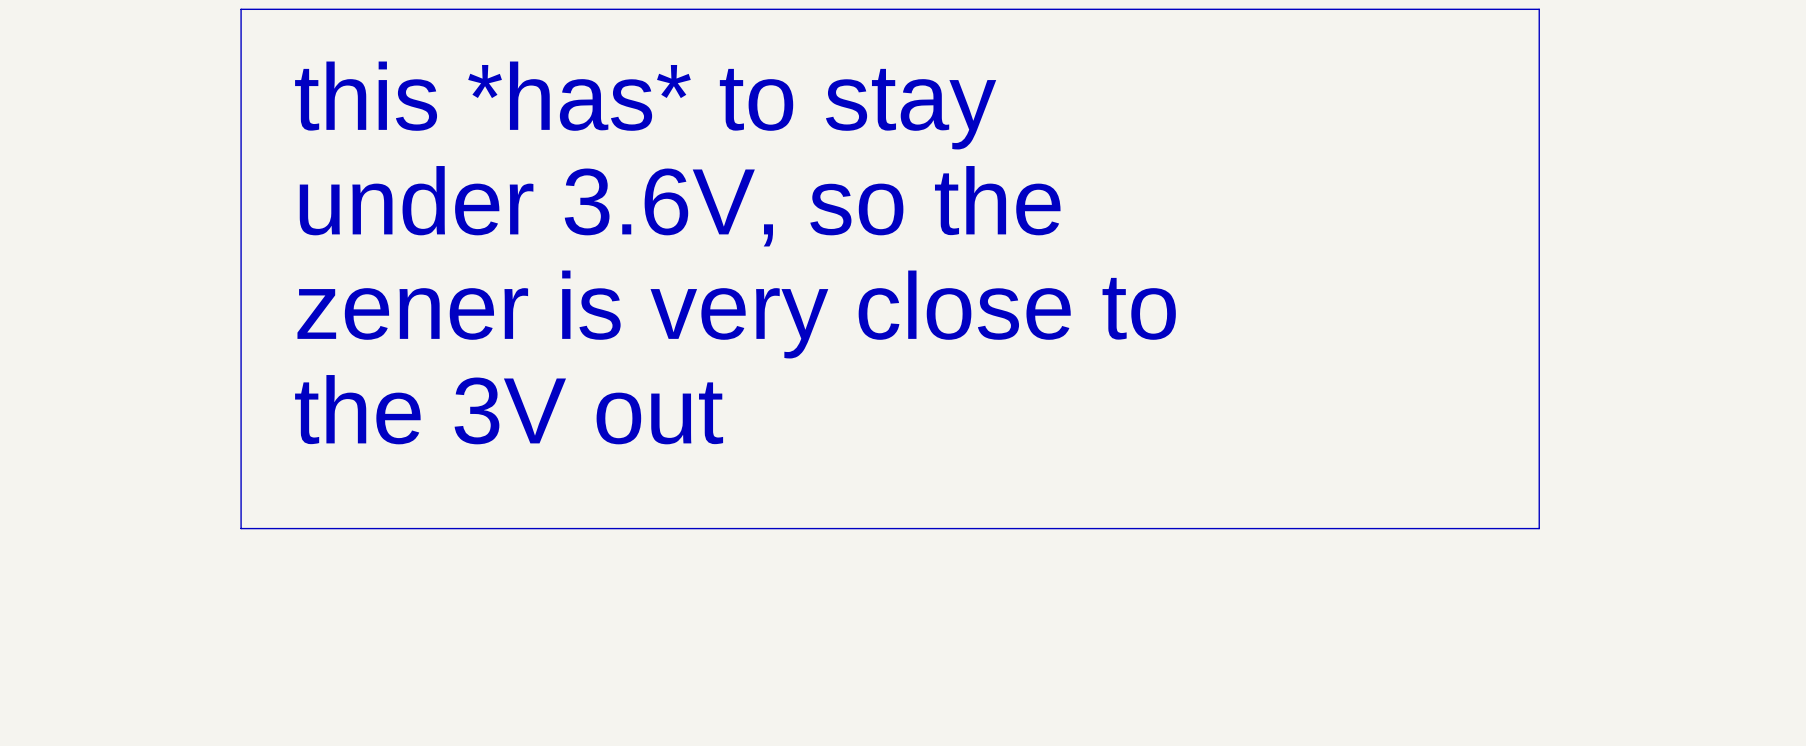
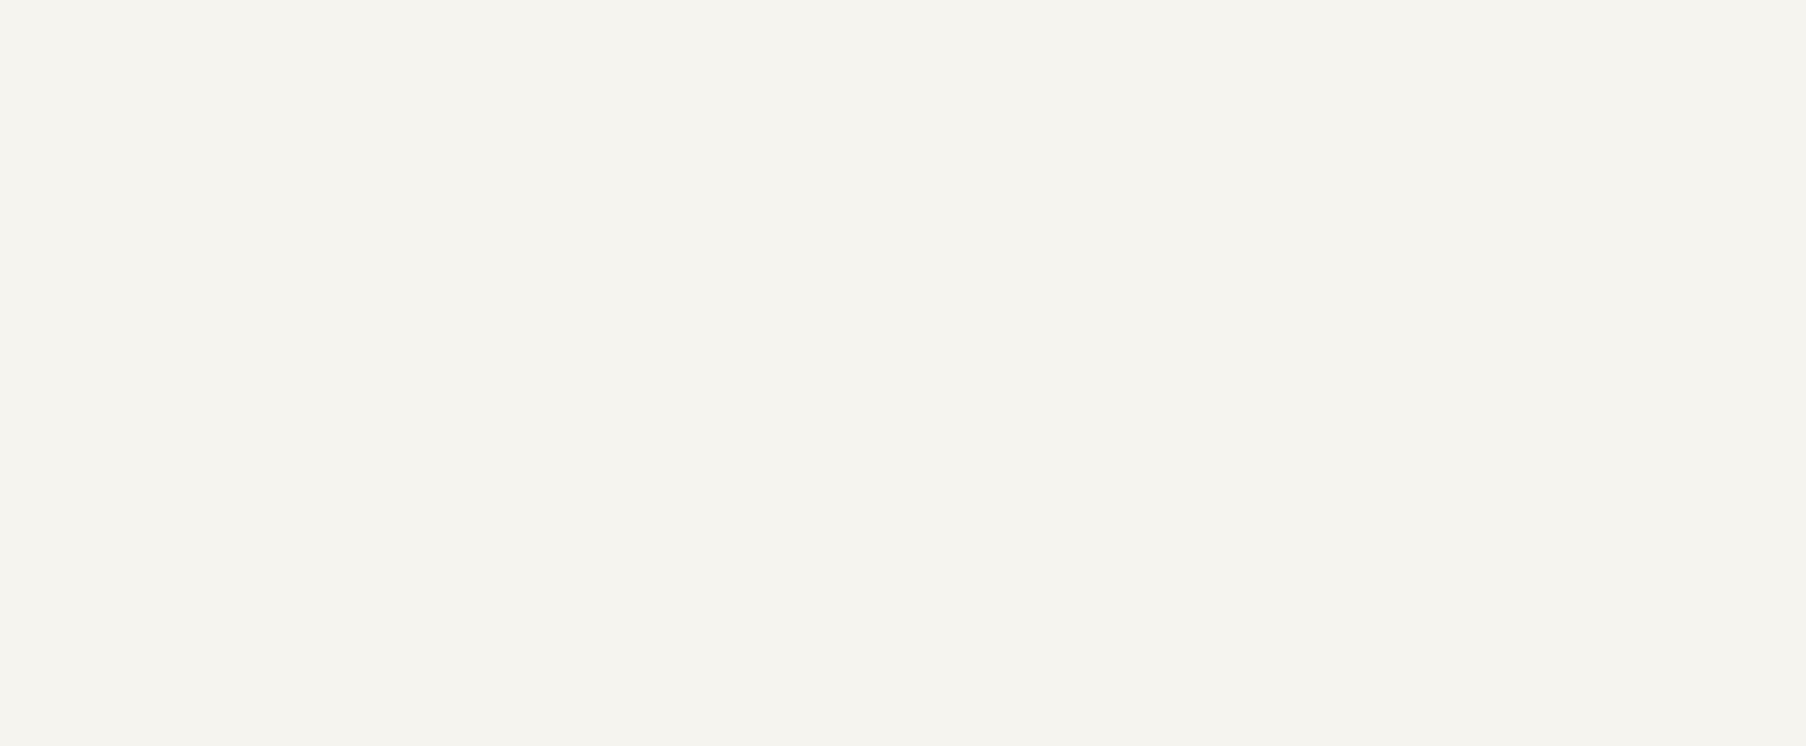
line: (241, 9) (1539, 9) (1539, 528) (241, 528) (241, 9) -> none
text: this *has* to stay (645, 105) -> none
text: under 3.6V, so the (680, 206) -> none
text: zener is very close to (736, 314) -> none
text: the 3V out (509, 409) -> none

